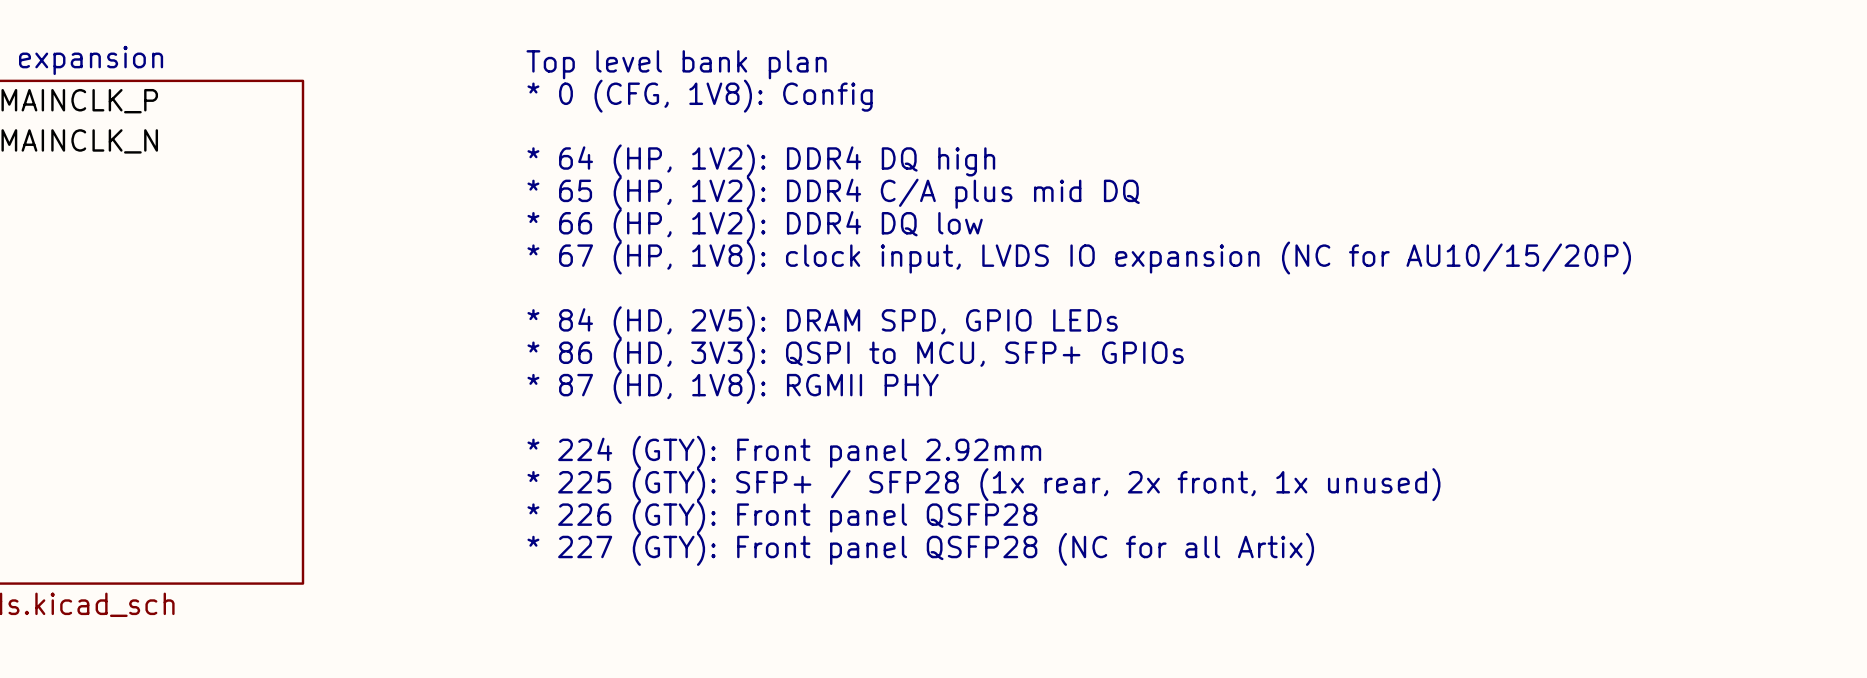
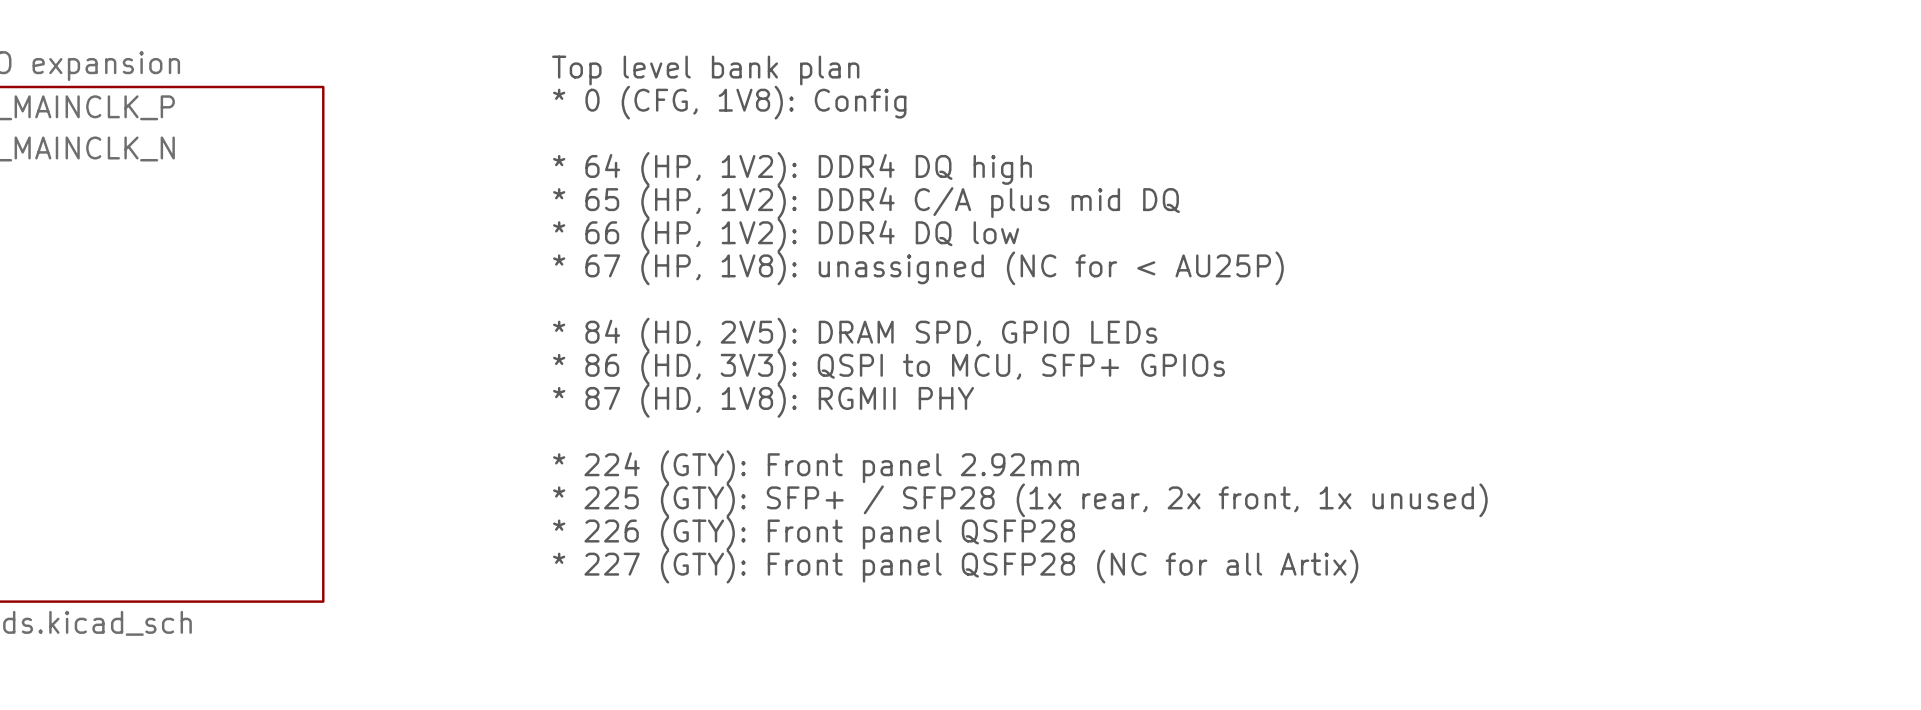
text: * 67 (HP, 1V8): clock input, LVDS IO expansion (NC for AU10/15/20P) (1079, 258) -> * 67 (HP, 1V8): unassigned (NC for < AU25P) (918, 268)

